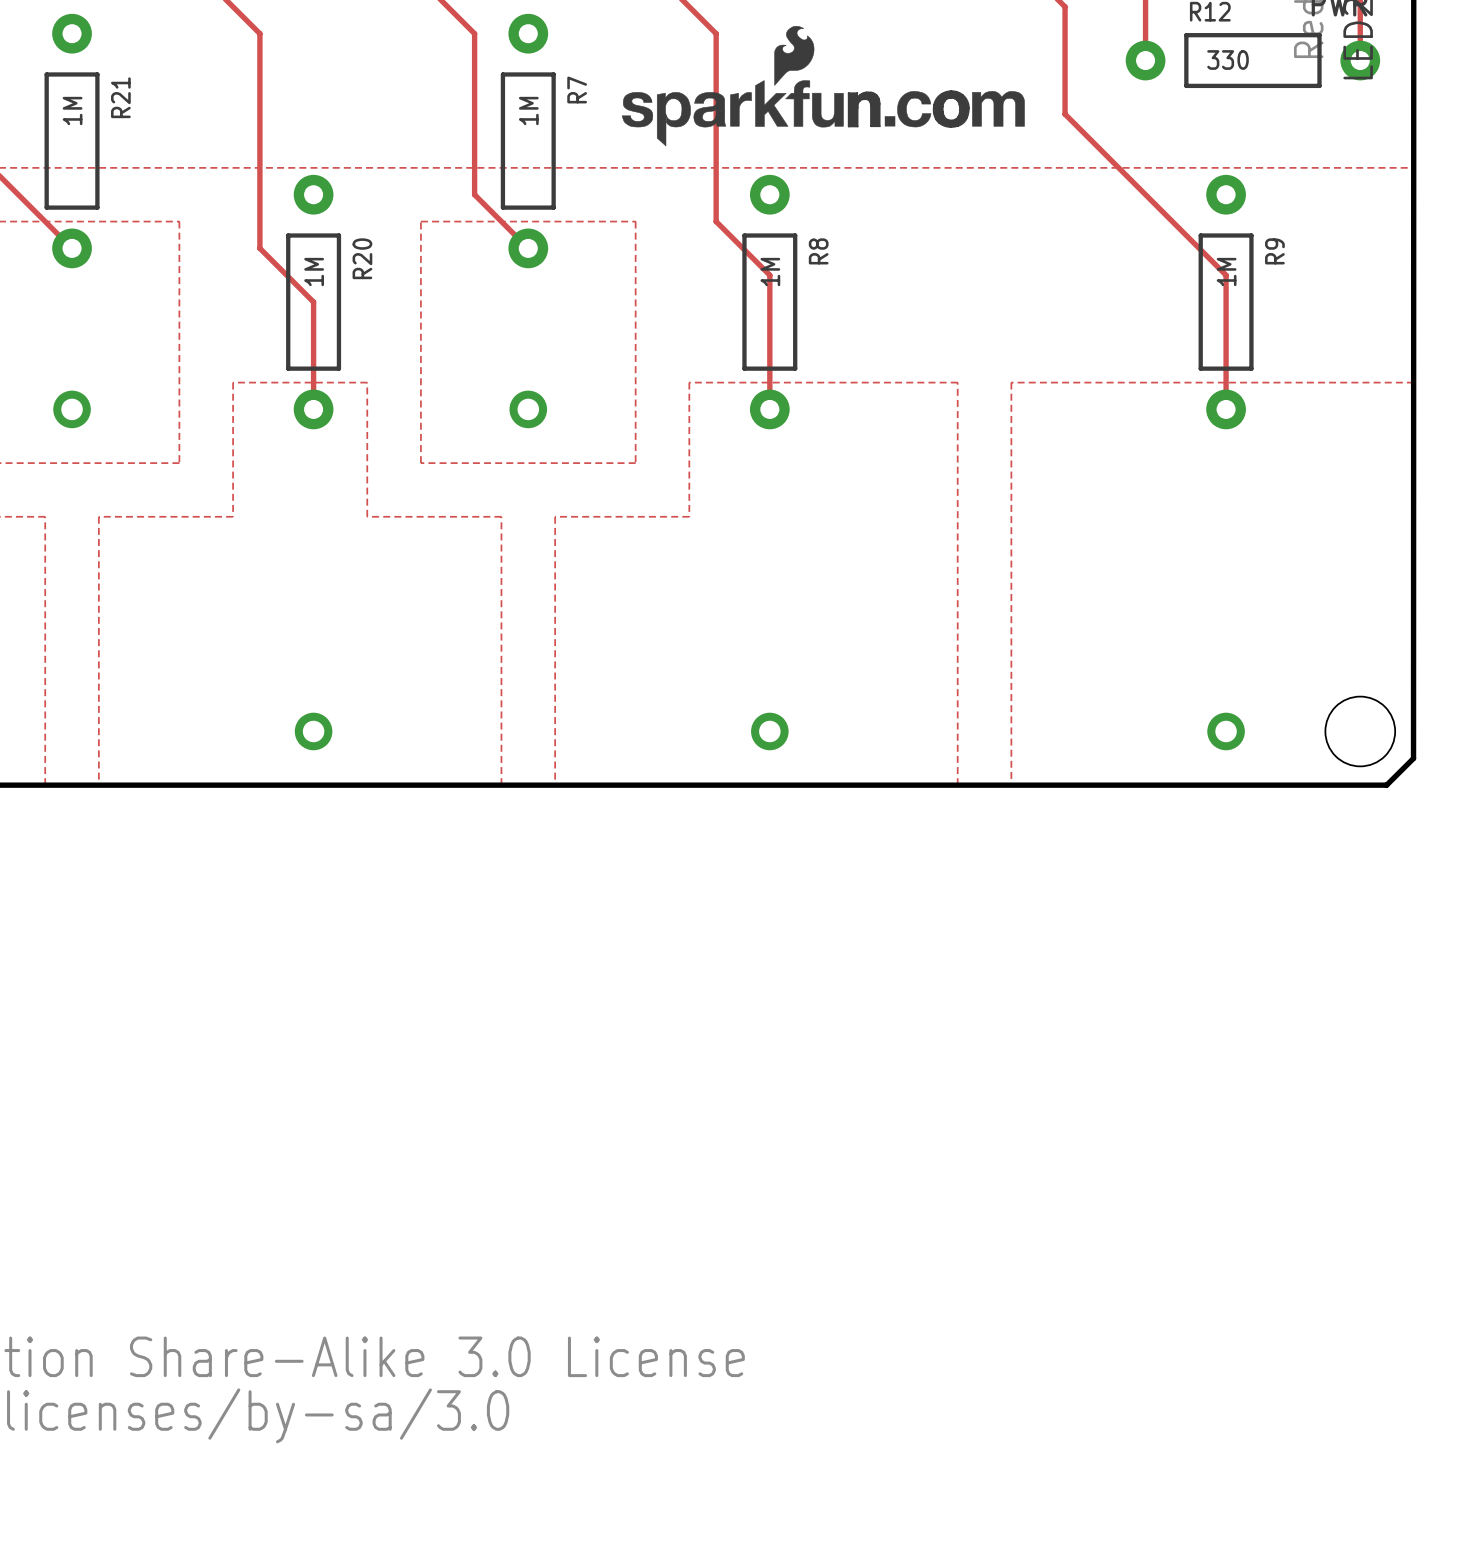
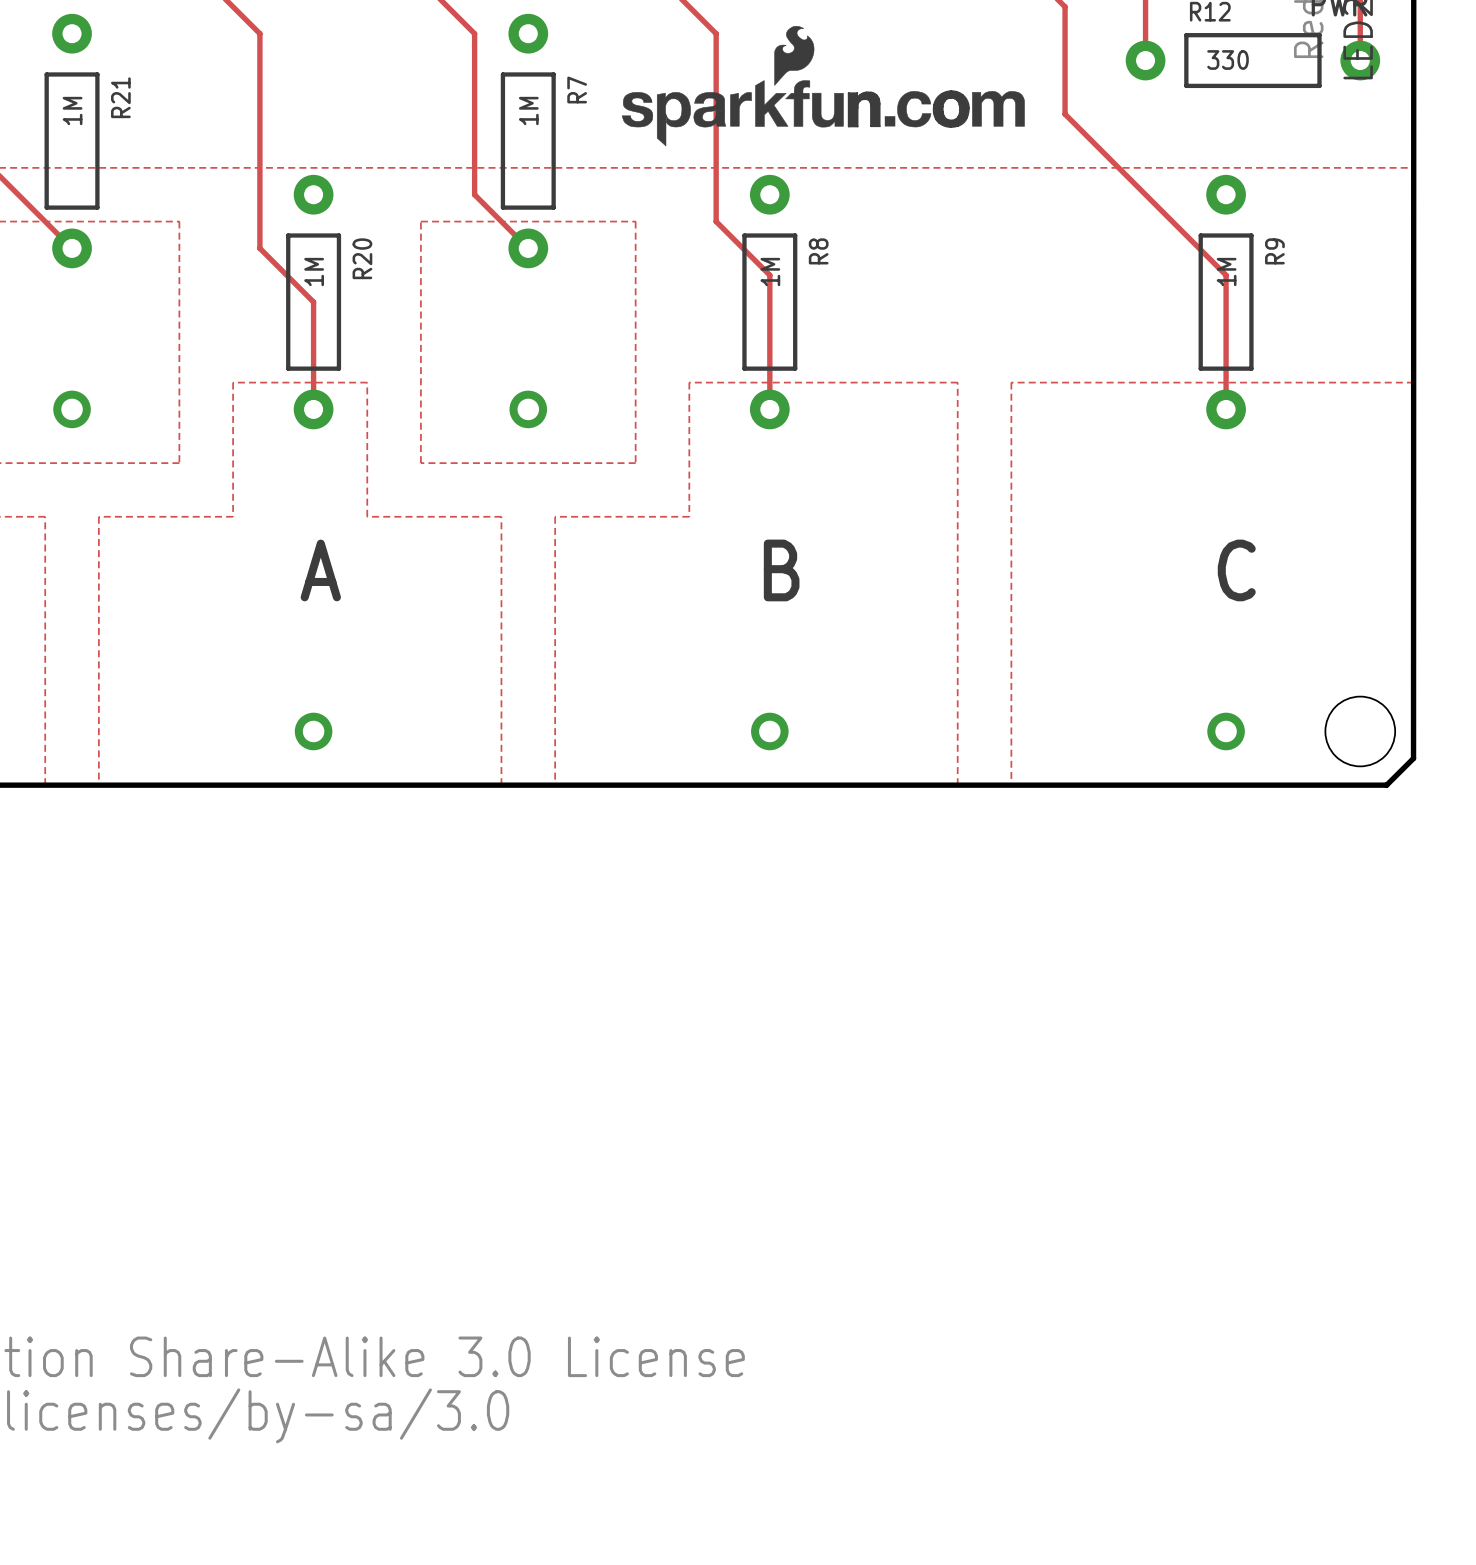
text: none -> A (320, 570)
text: none -> B (781, 570)
text: none -> C (1236, 570)

